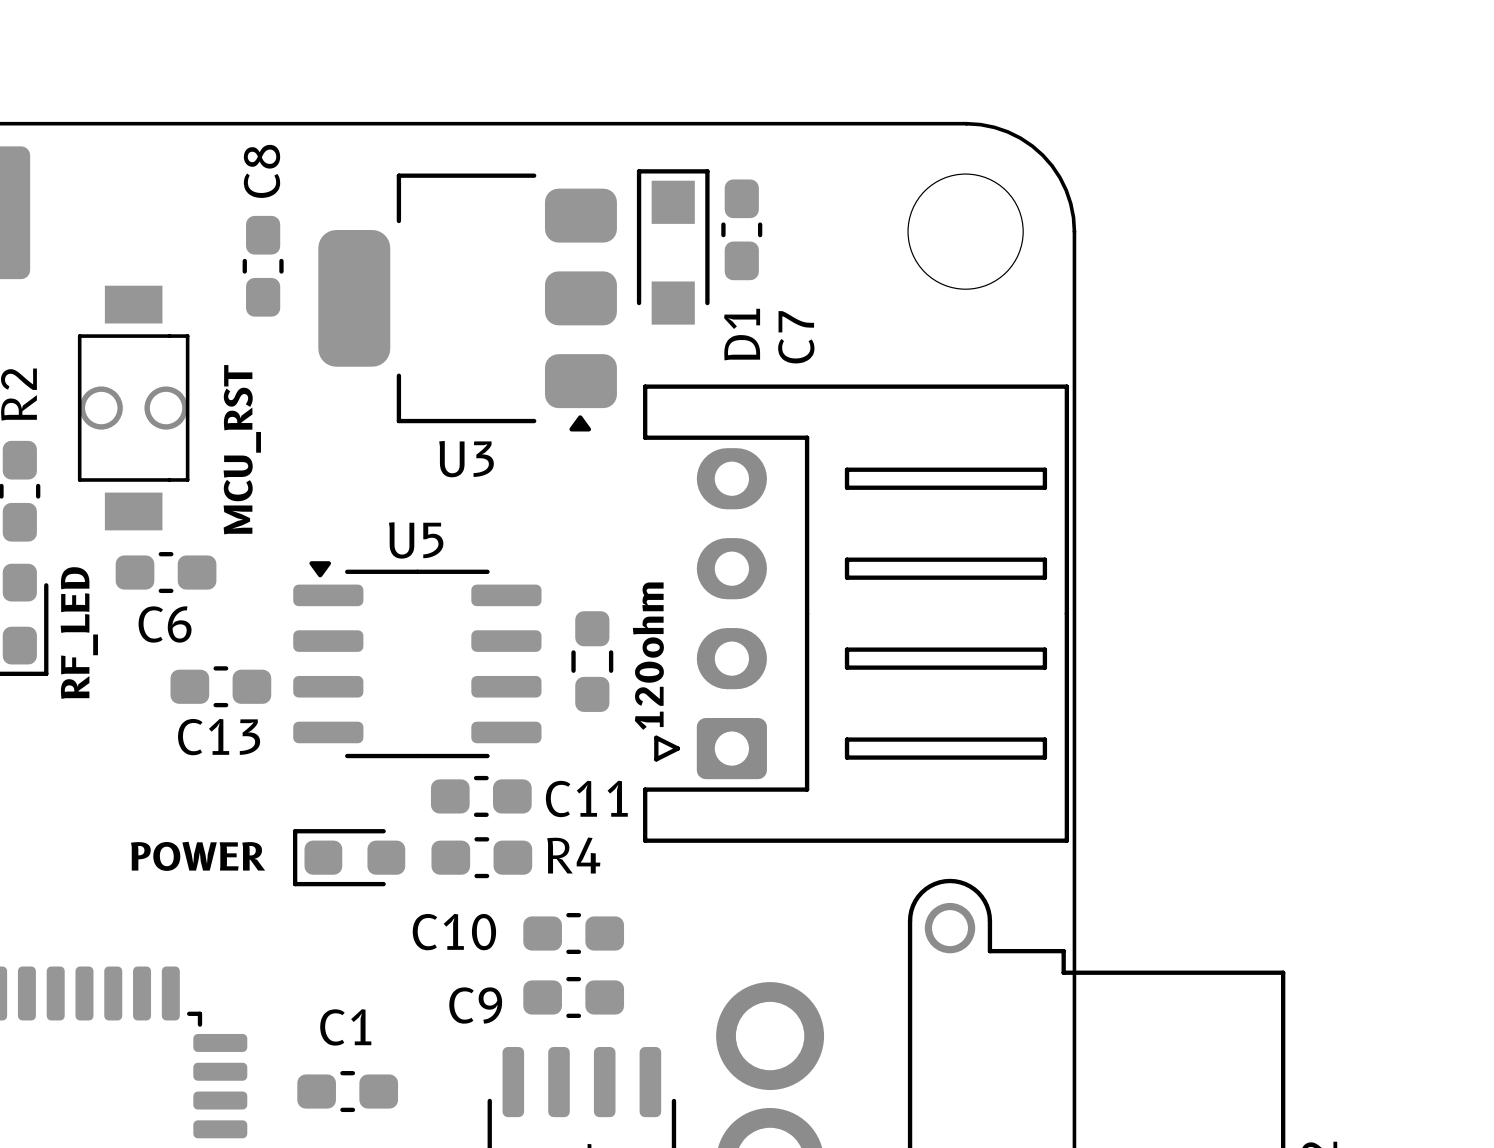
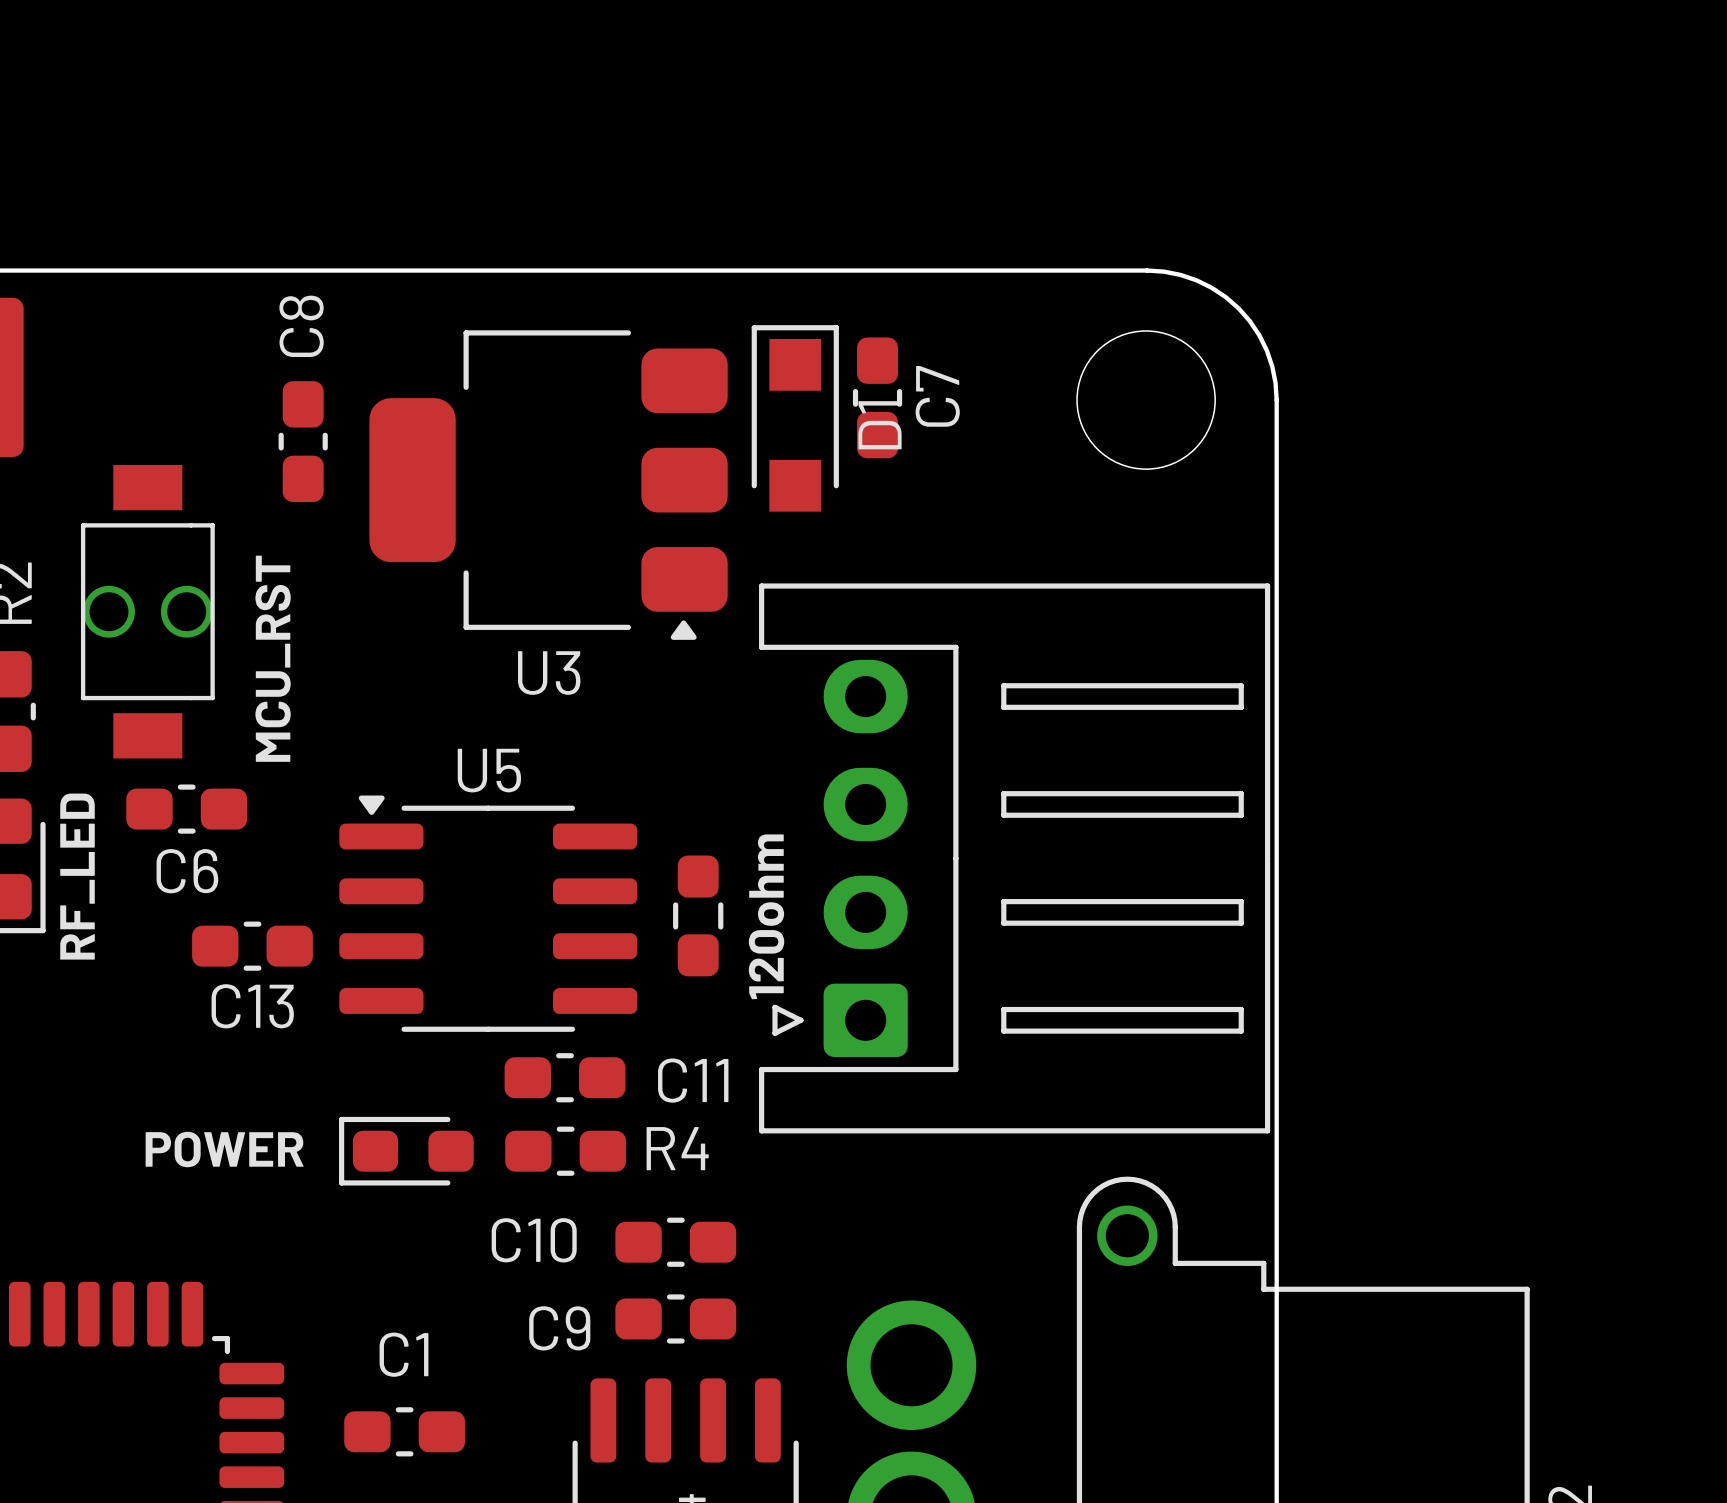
D1 name position: D1 (742, 334) -> D1 (880, 425)
C7 name position: C7 (796, 337) -> C7 (937, 396)

